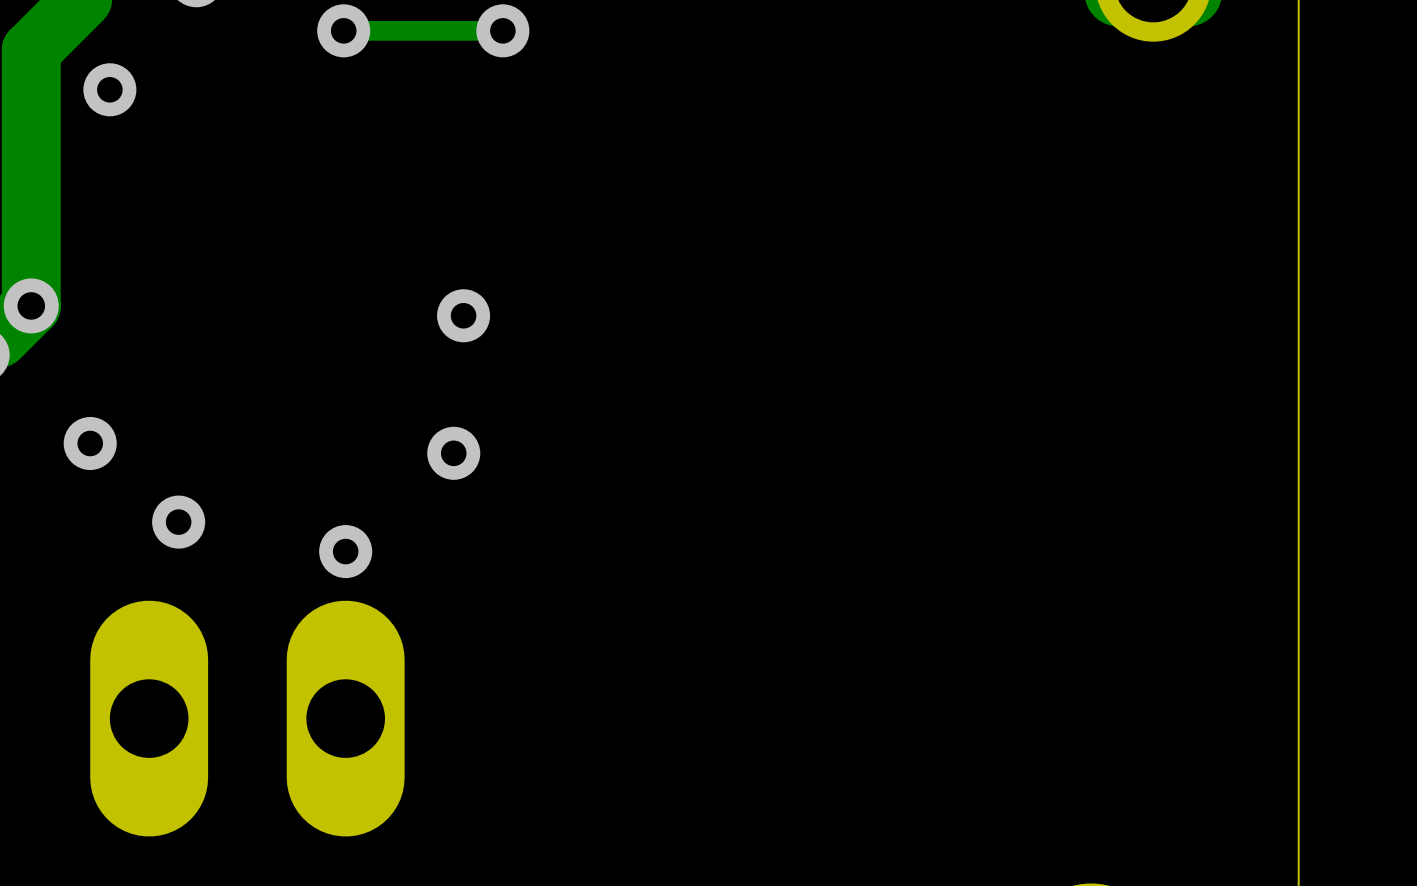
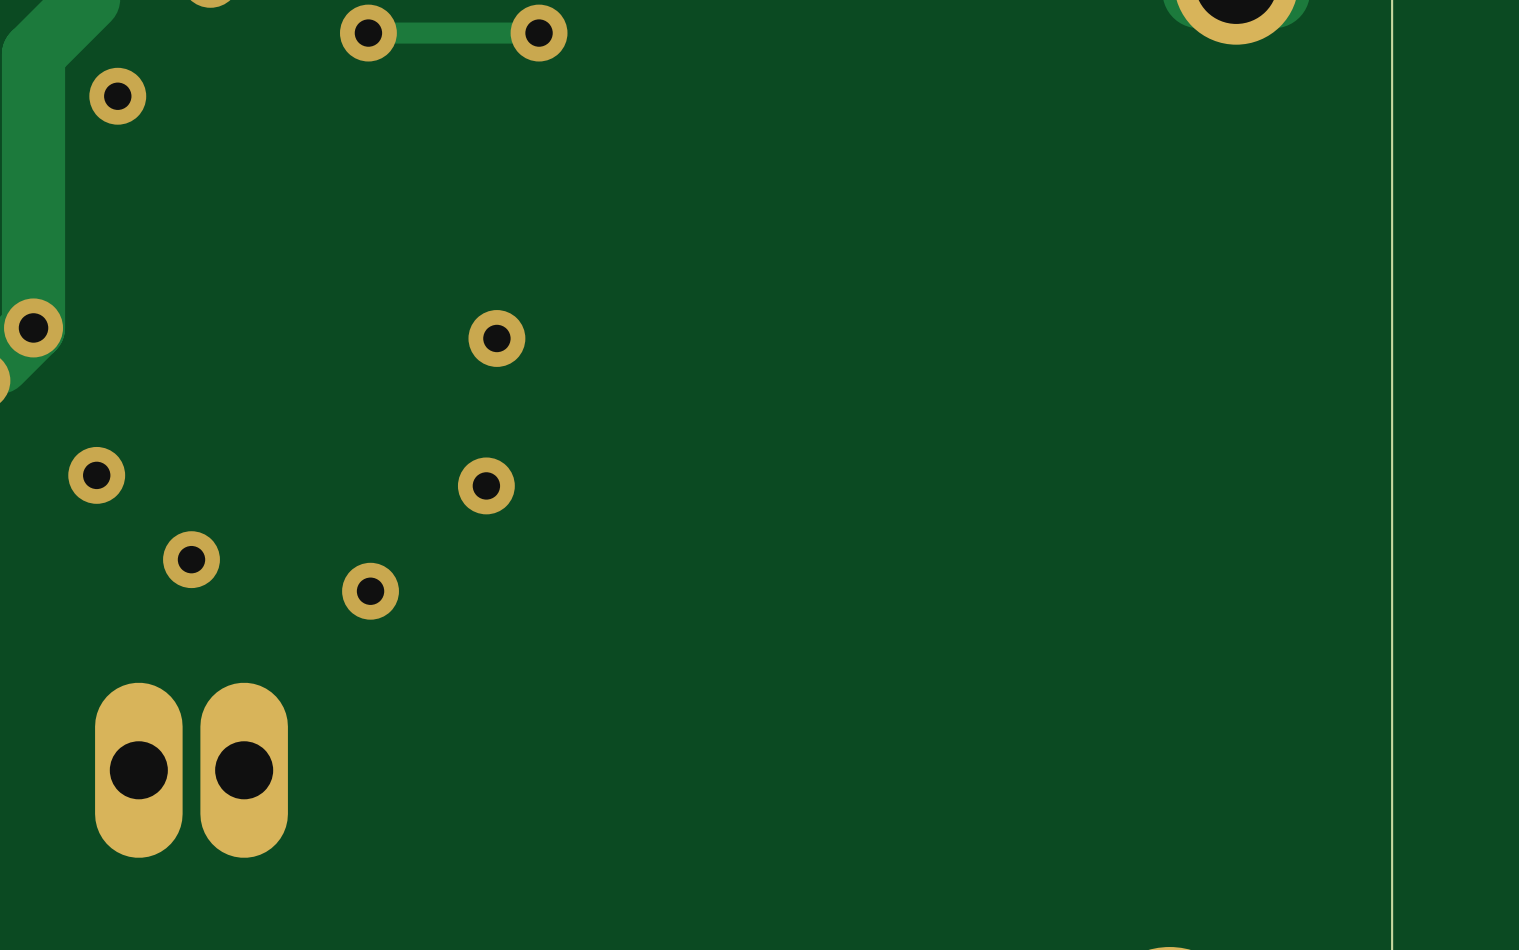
part footprint: [90, 600, 405, 837] -> [95, 682, 288, 858]

